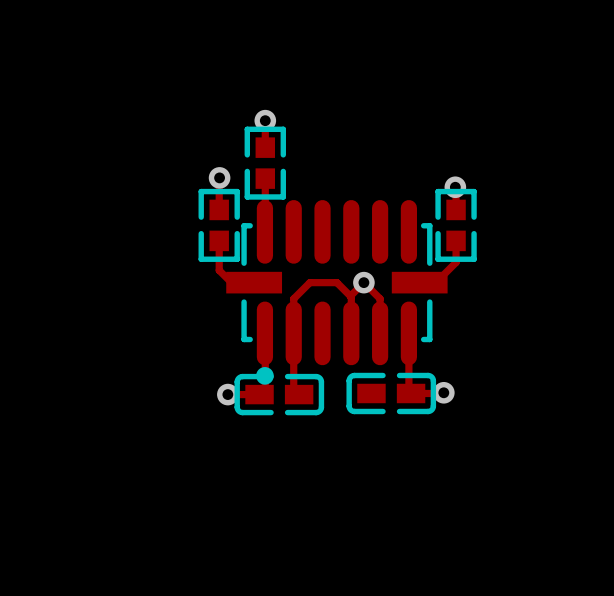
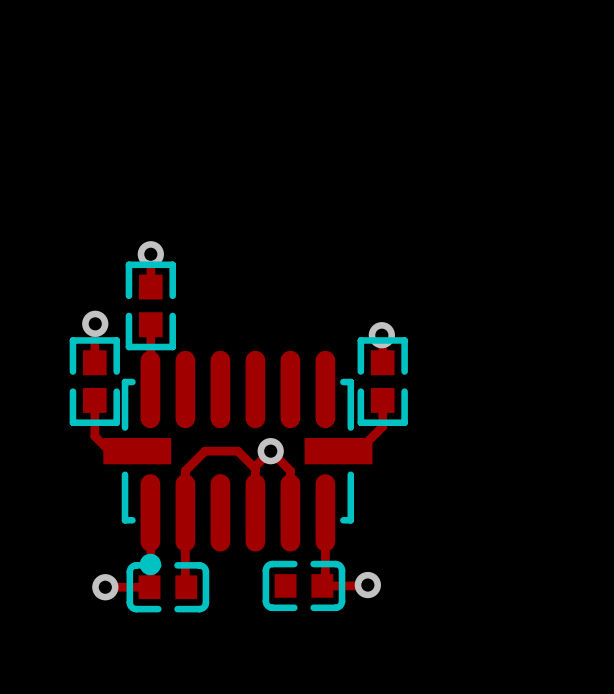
part footprint: [346, 372, 437, 415] -> [262, 560, 346, 612]
part footprint: [234, 373, 325, 416] -> [126, 562, 210, 613]

